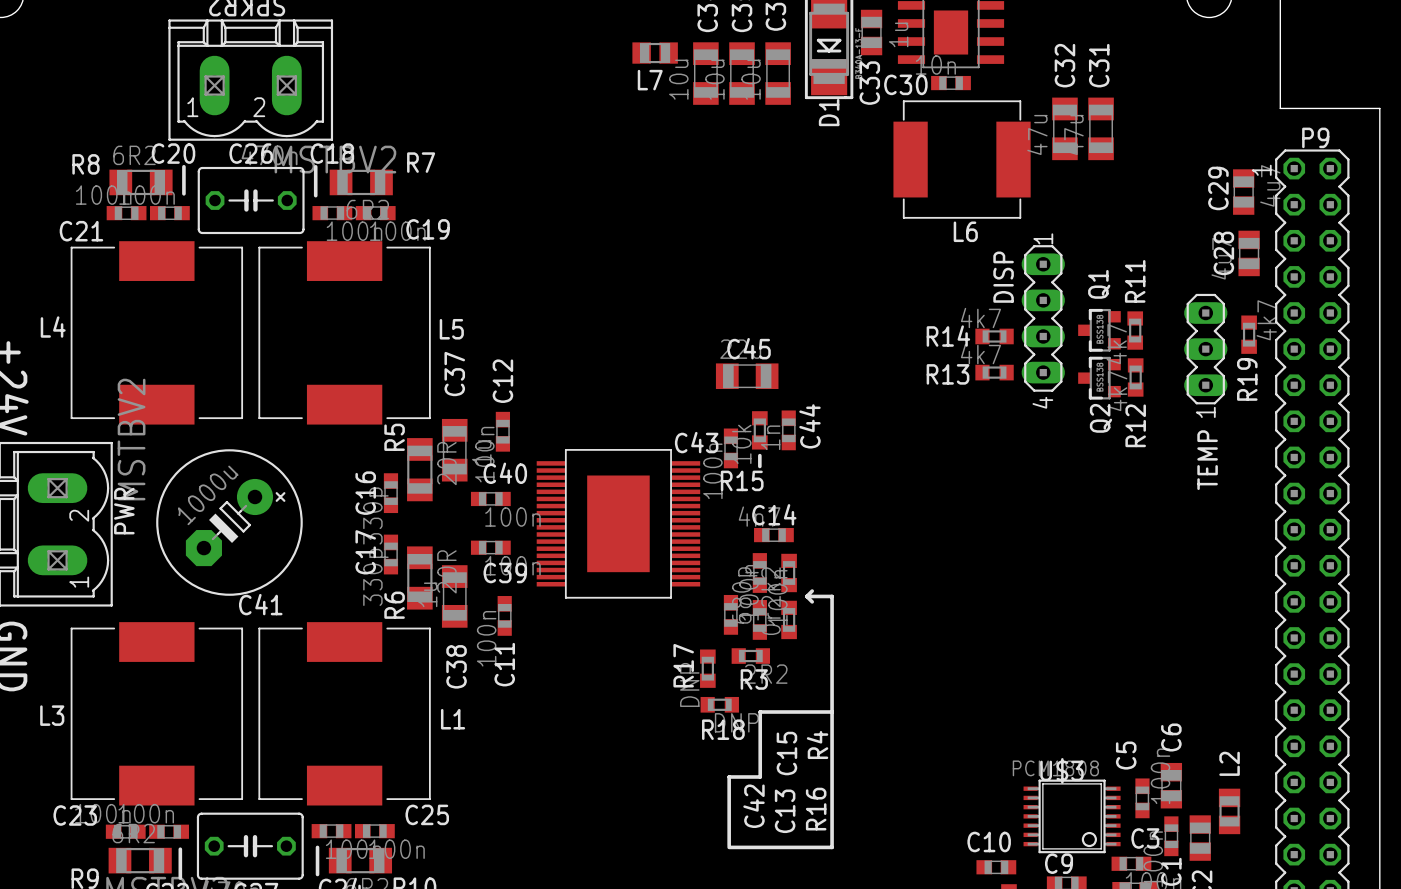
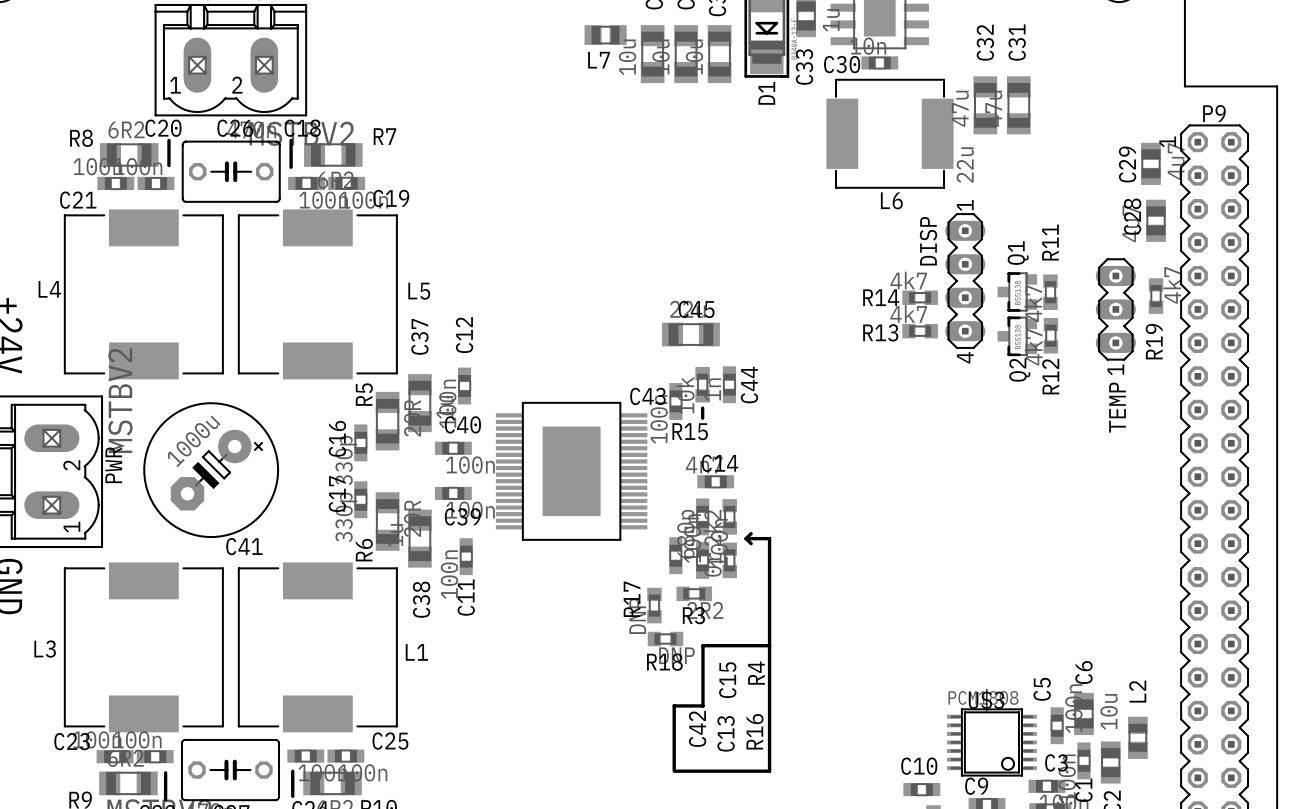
L6 value: none -> 22u (965, 164)
C6 value: none -> 10u (1109, 711)

